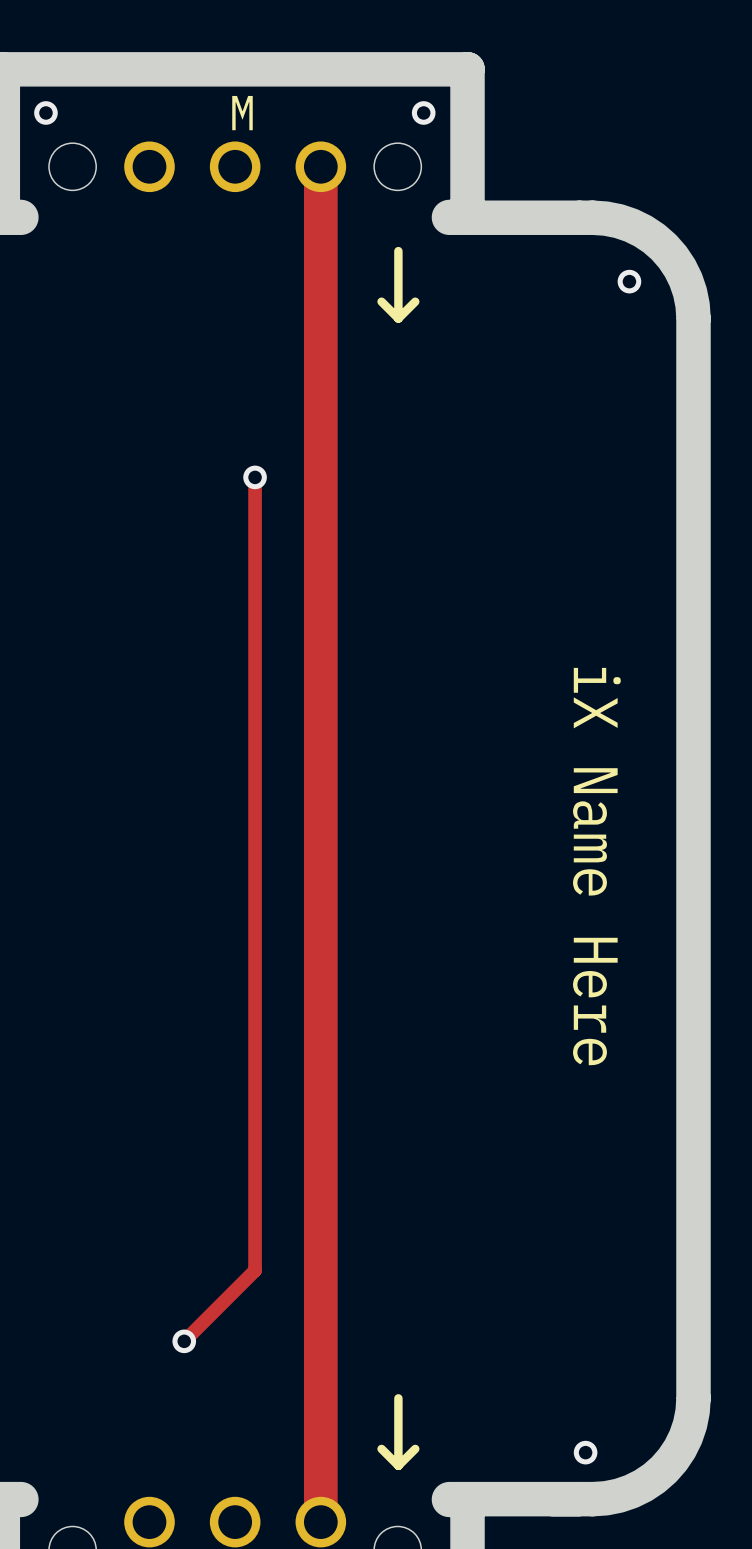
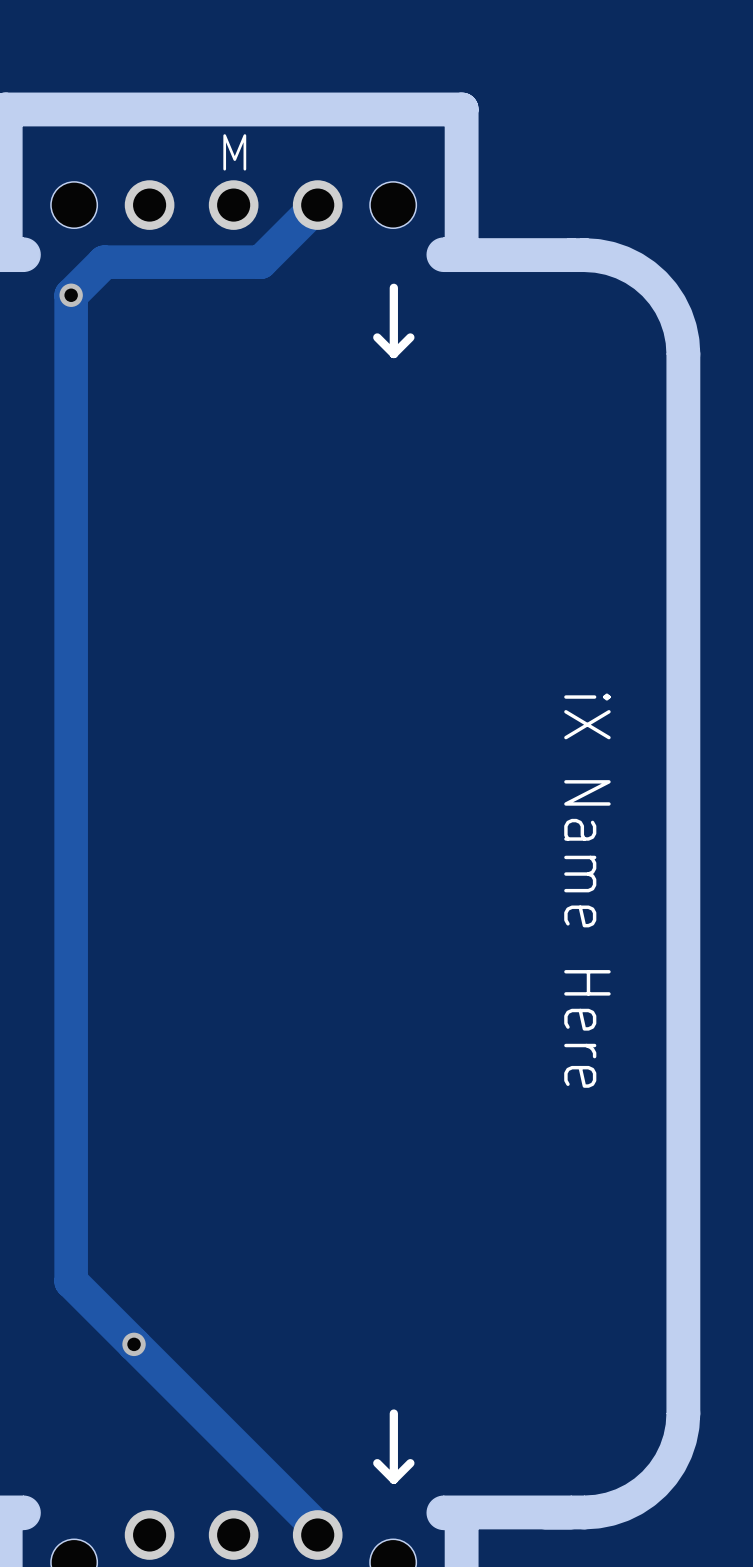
via: (45, 112) -> none
via: (423, 112) -> none
track: (320, 166) (320, 1515) -> (317, 205) (260, 262) (104, 262) (71, 295) (71, 1281) (317, 1528)
via: none -> (71, 295)
via: (629, 281) -> none
track: (255, 477) (255, 1270) (184, 1341) -> none
via: (255, 477) -> none
via position: (184, 1341) -> (134, 1344)
via: (585, 1452) -> none

